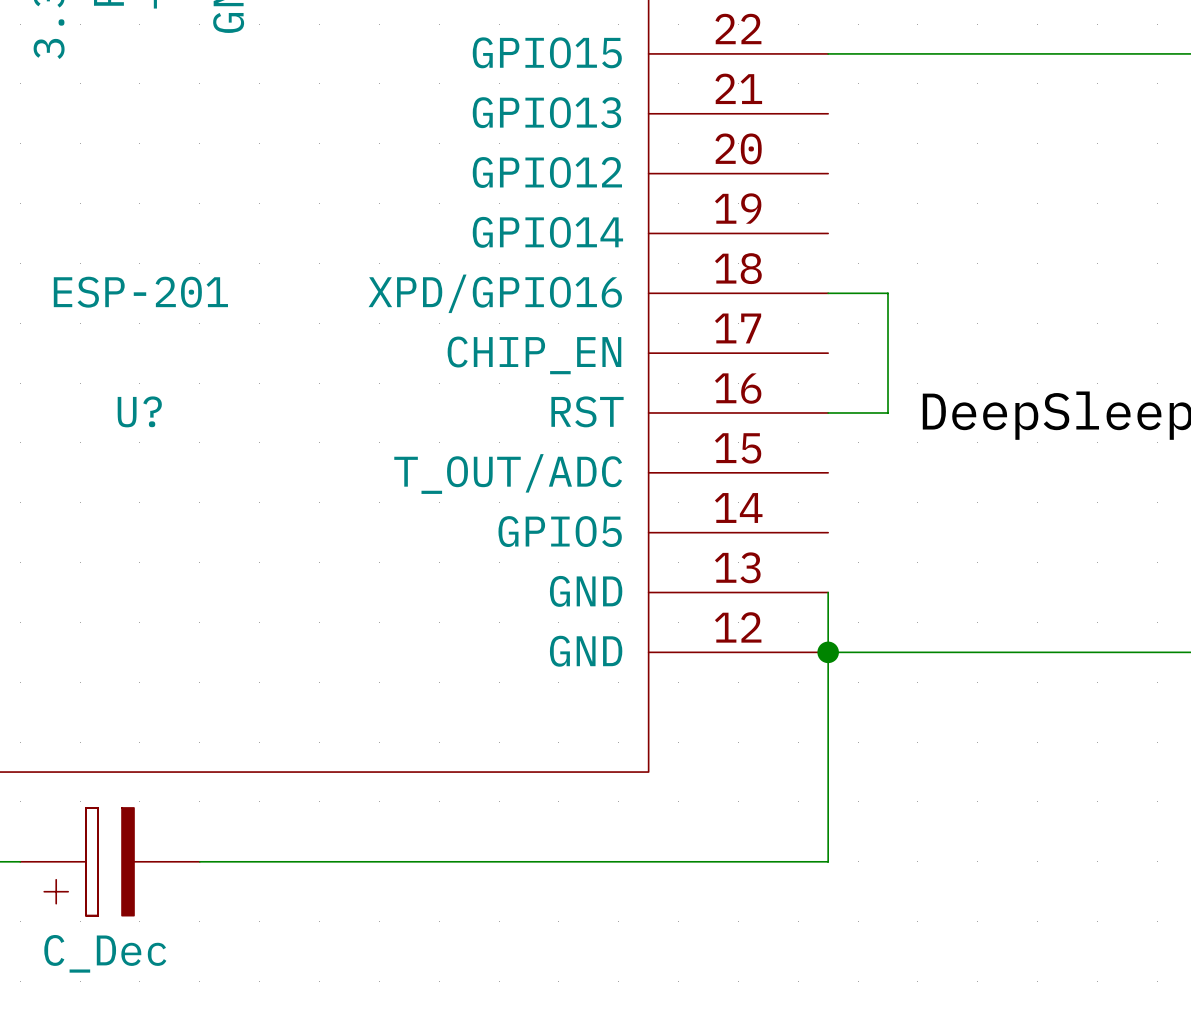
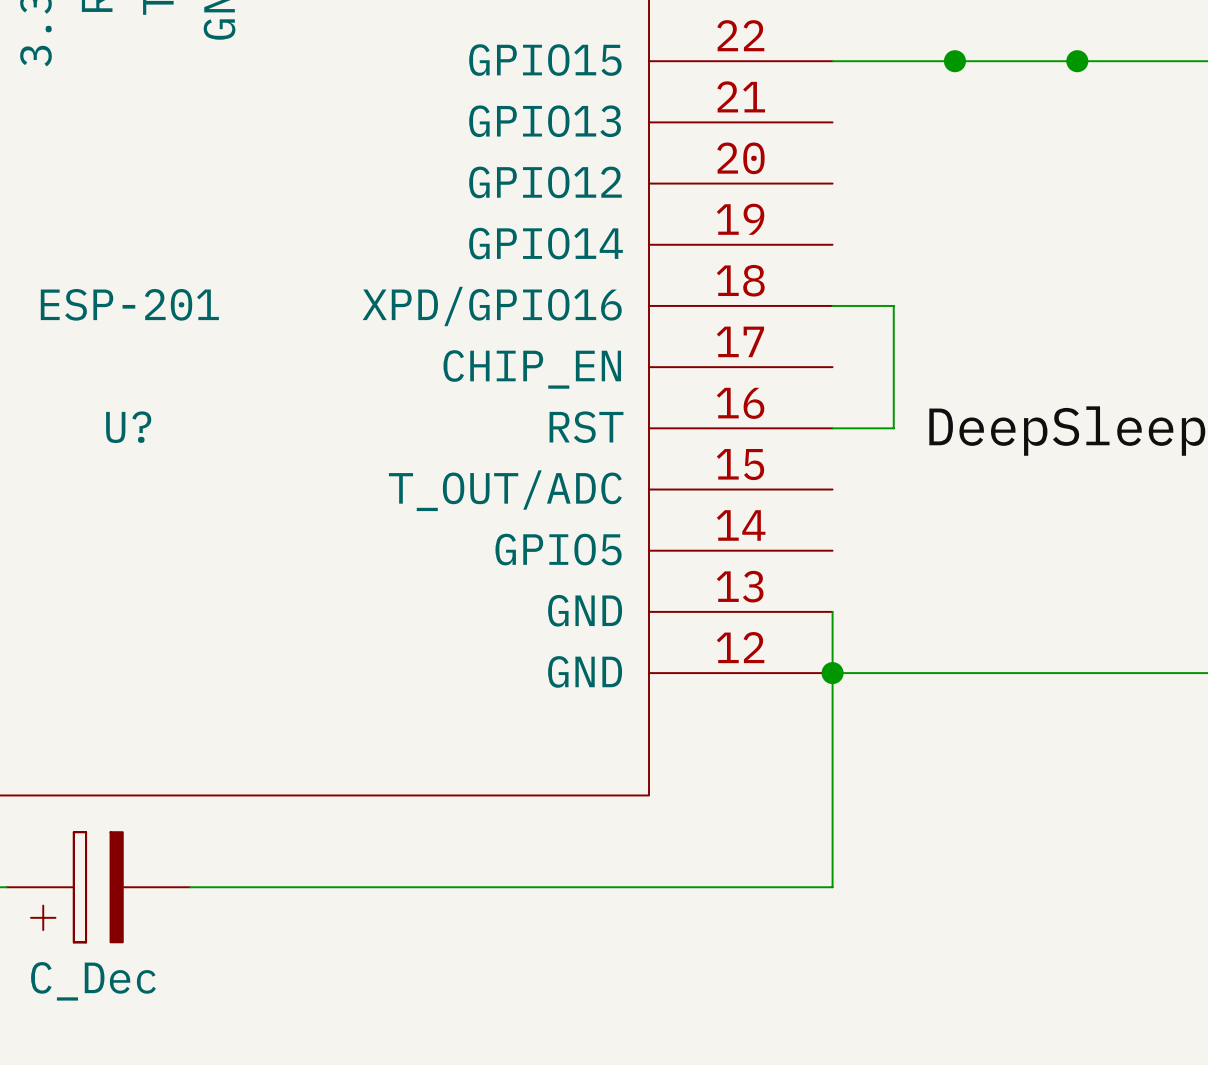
junction: none -> (954, 61)
junction: none -> (1077, 61)

